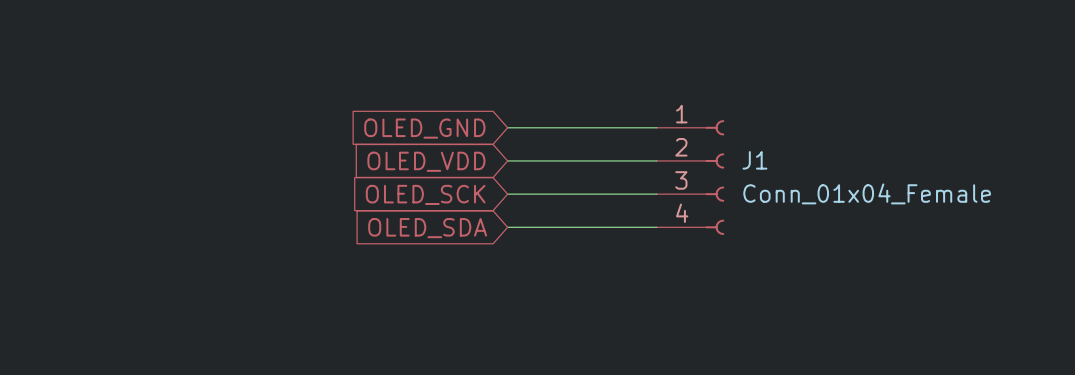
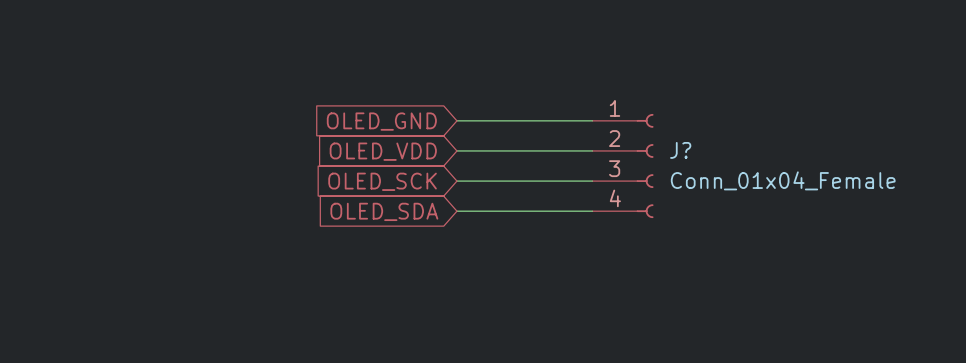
J1 name: J1 (754, 160) -> J? (680, 150)

